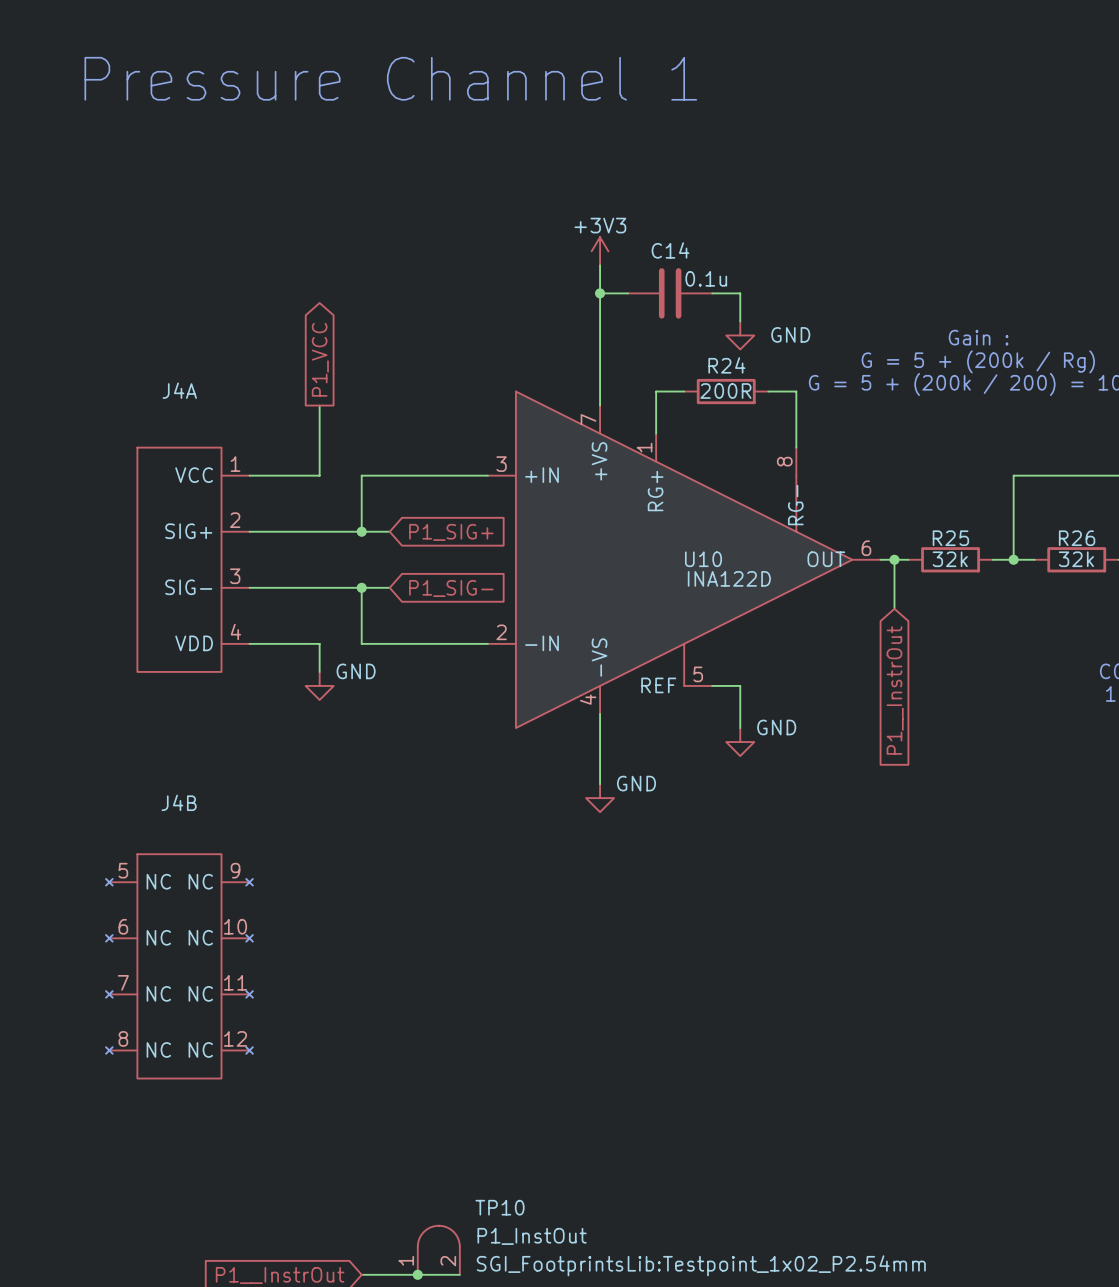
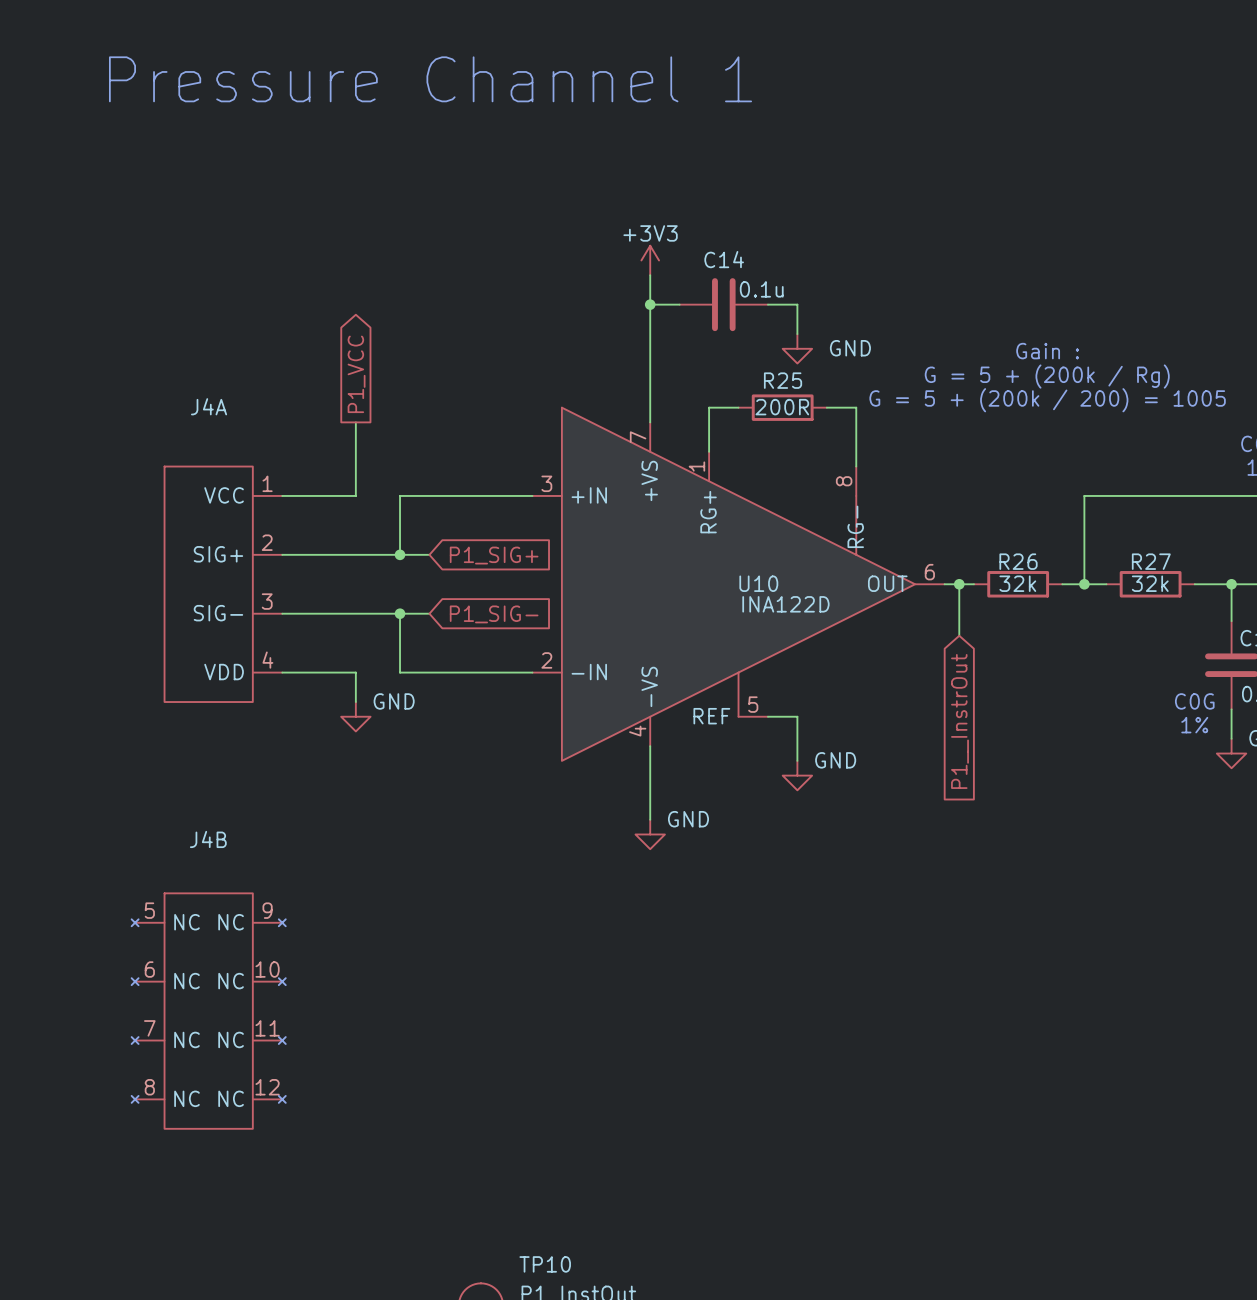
R24 name: R24 (726, 365) -> R25 (783, 380)
R25 name: R25 (950, 538) -> R26 (1018, 561)
R26 name: R26 (1077, 538) -> R27 (1151, 561)

